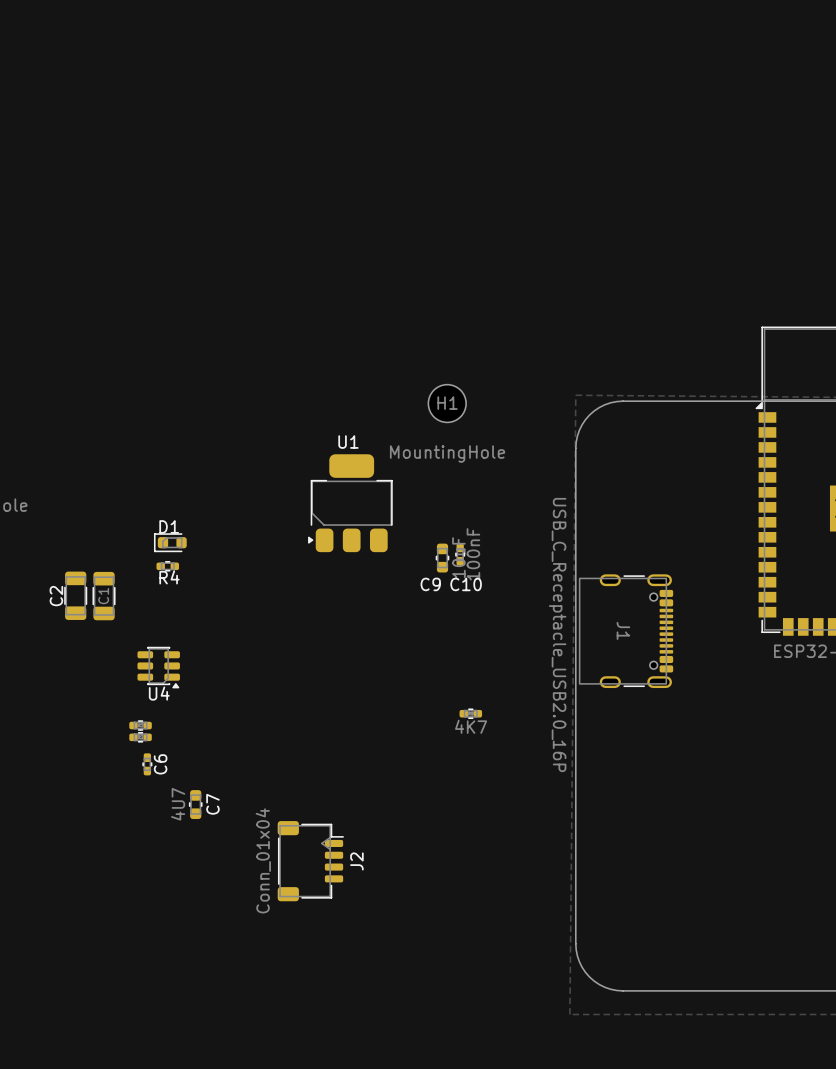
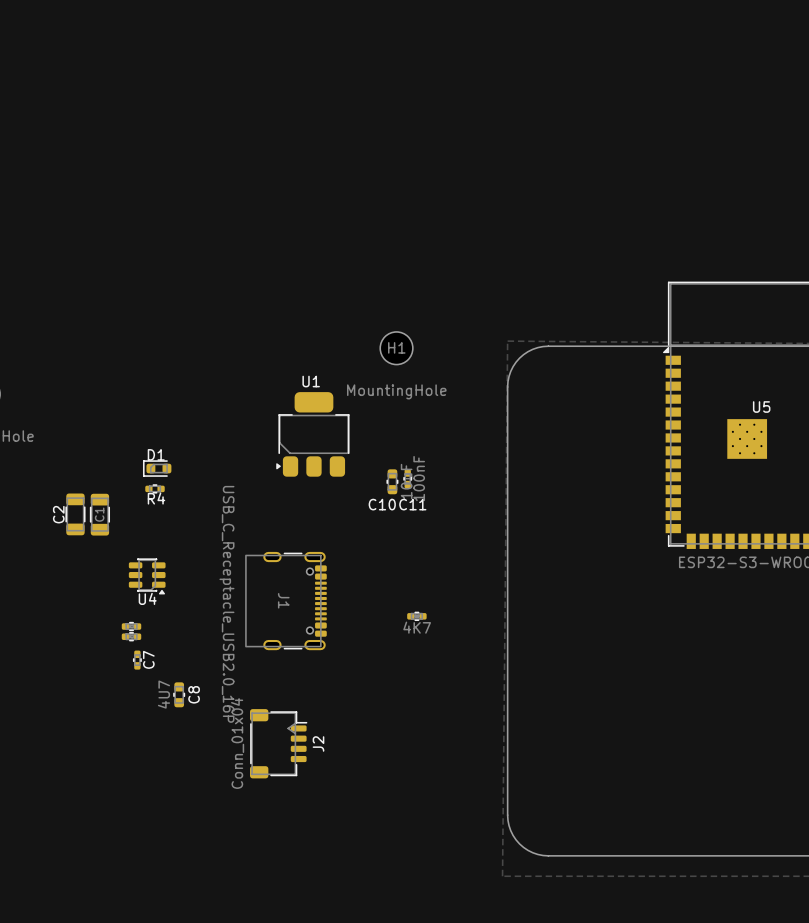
C9 name: C9 (430, 584) -> C10 (382, 504)
C10 name: C10 (466, 584) -> C11 (412, 504)
J1 position: (626, 631) -> (286, 601)
C6 name: C6 (160, 764) -> C7 (148, 659)
C7 name: C7 (212, 804) -> C8 (194, 694)

